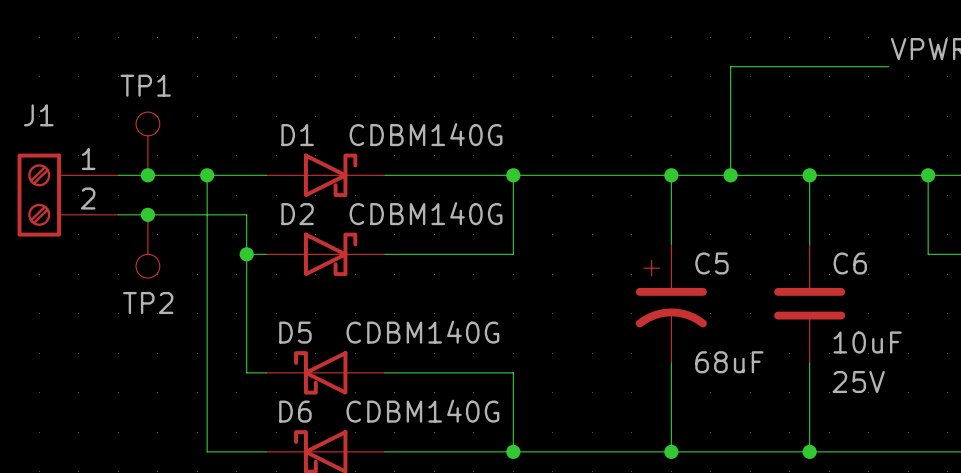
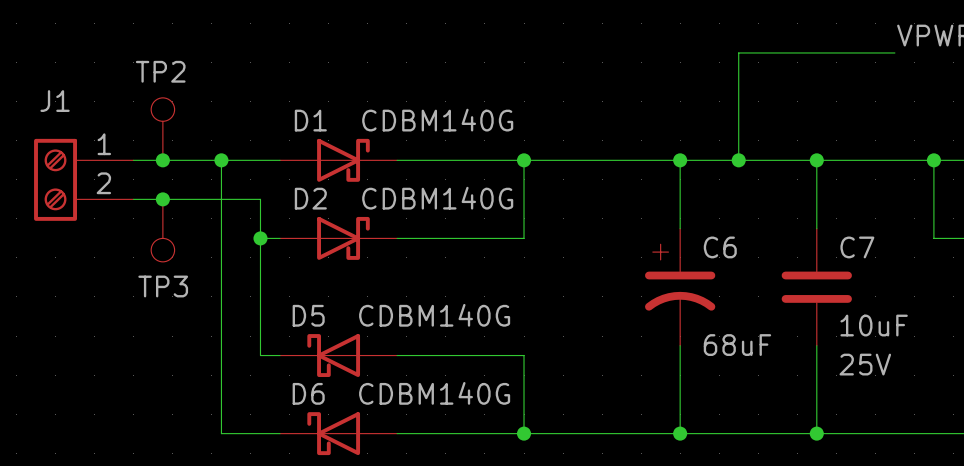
TP1 name: TP1 (145, 85) -> TP2 (160, 71)
C5 name: C5 (711, 263) -> C6 (720, 247)
C6 name: C6 (850, 263) -> C7 (857, 247)
TP2 name: TP2 (148, 302) -> TP3 (163, 286)

